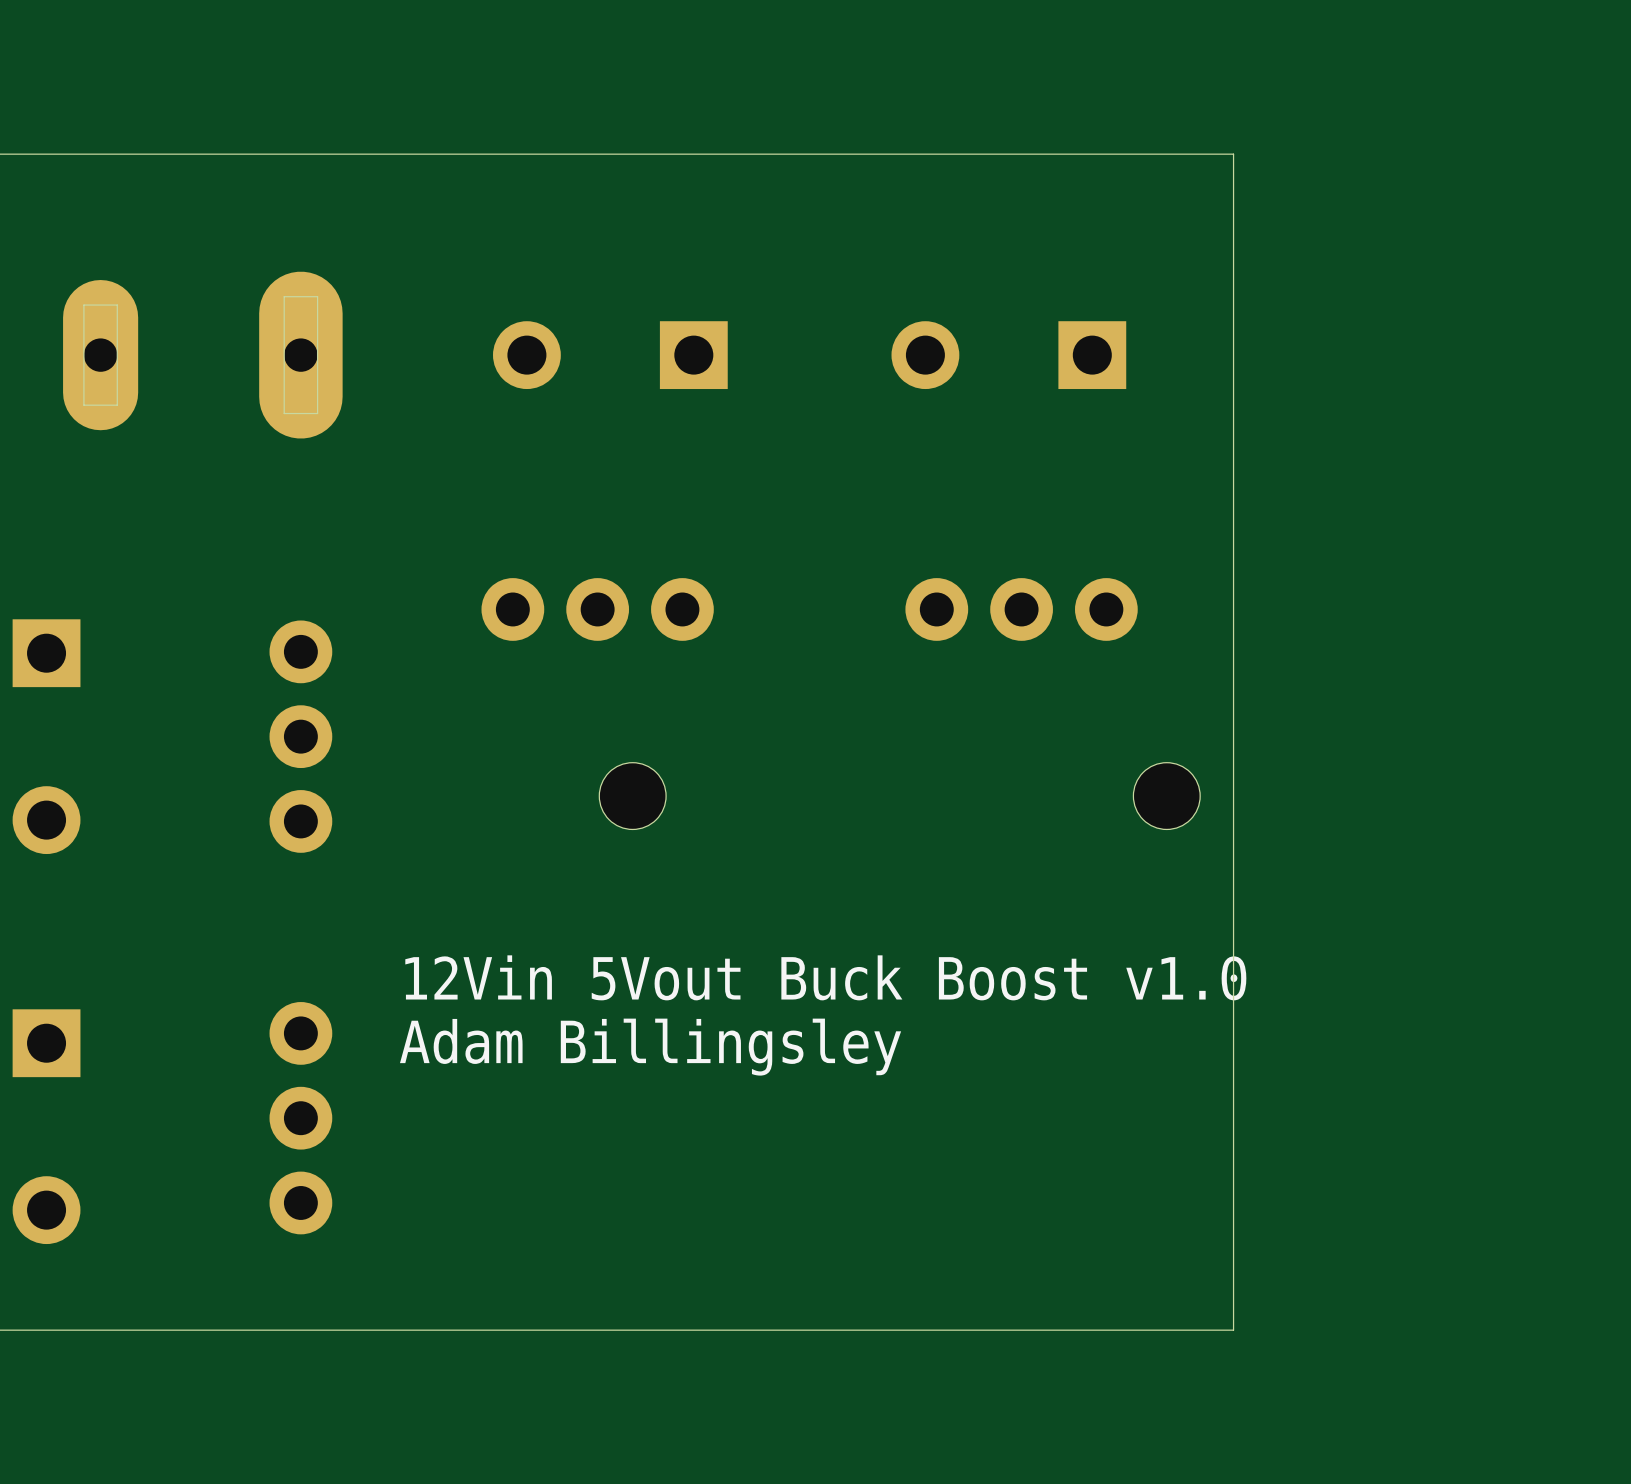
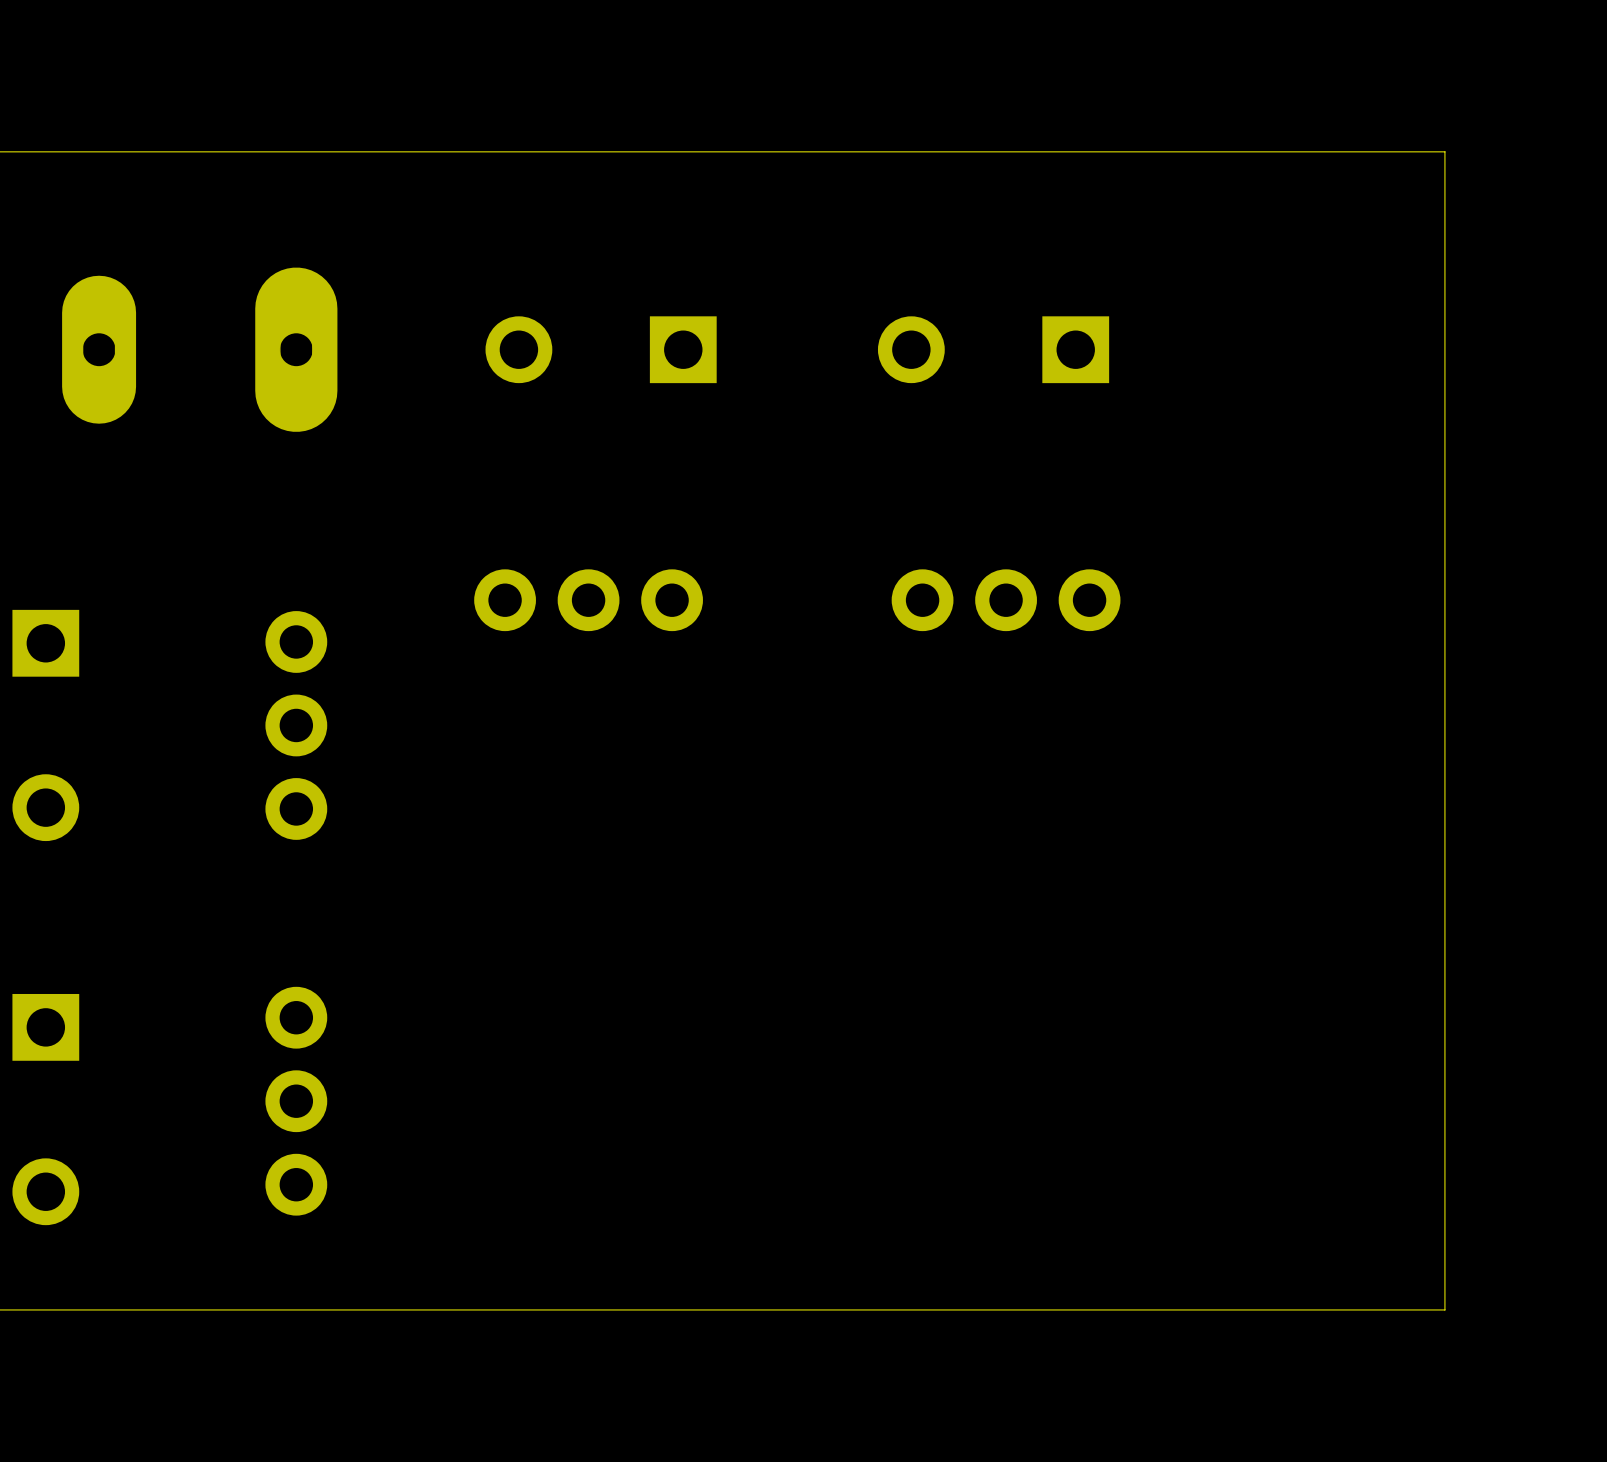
board edge: (1233, 154) (1233, 1330) -> (1214, 151) (1444, 151) (1444, 1309) (1214, 1309)
hole: (632, 796) -> none
hole: (1166, 796) -> none
text: 12Vin 5Vout Buck Boost v1.0 (825, 977) -> none
text: Adam Billingsley (650, 1047) -> none

